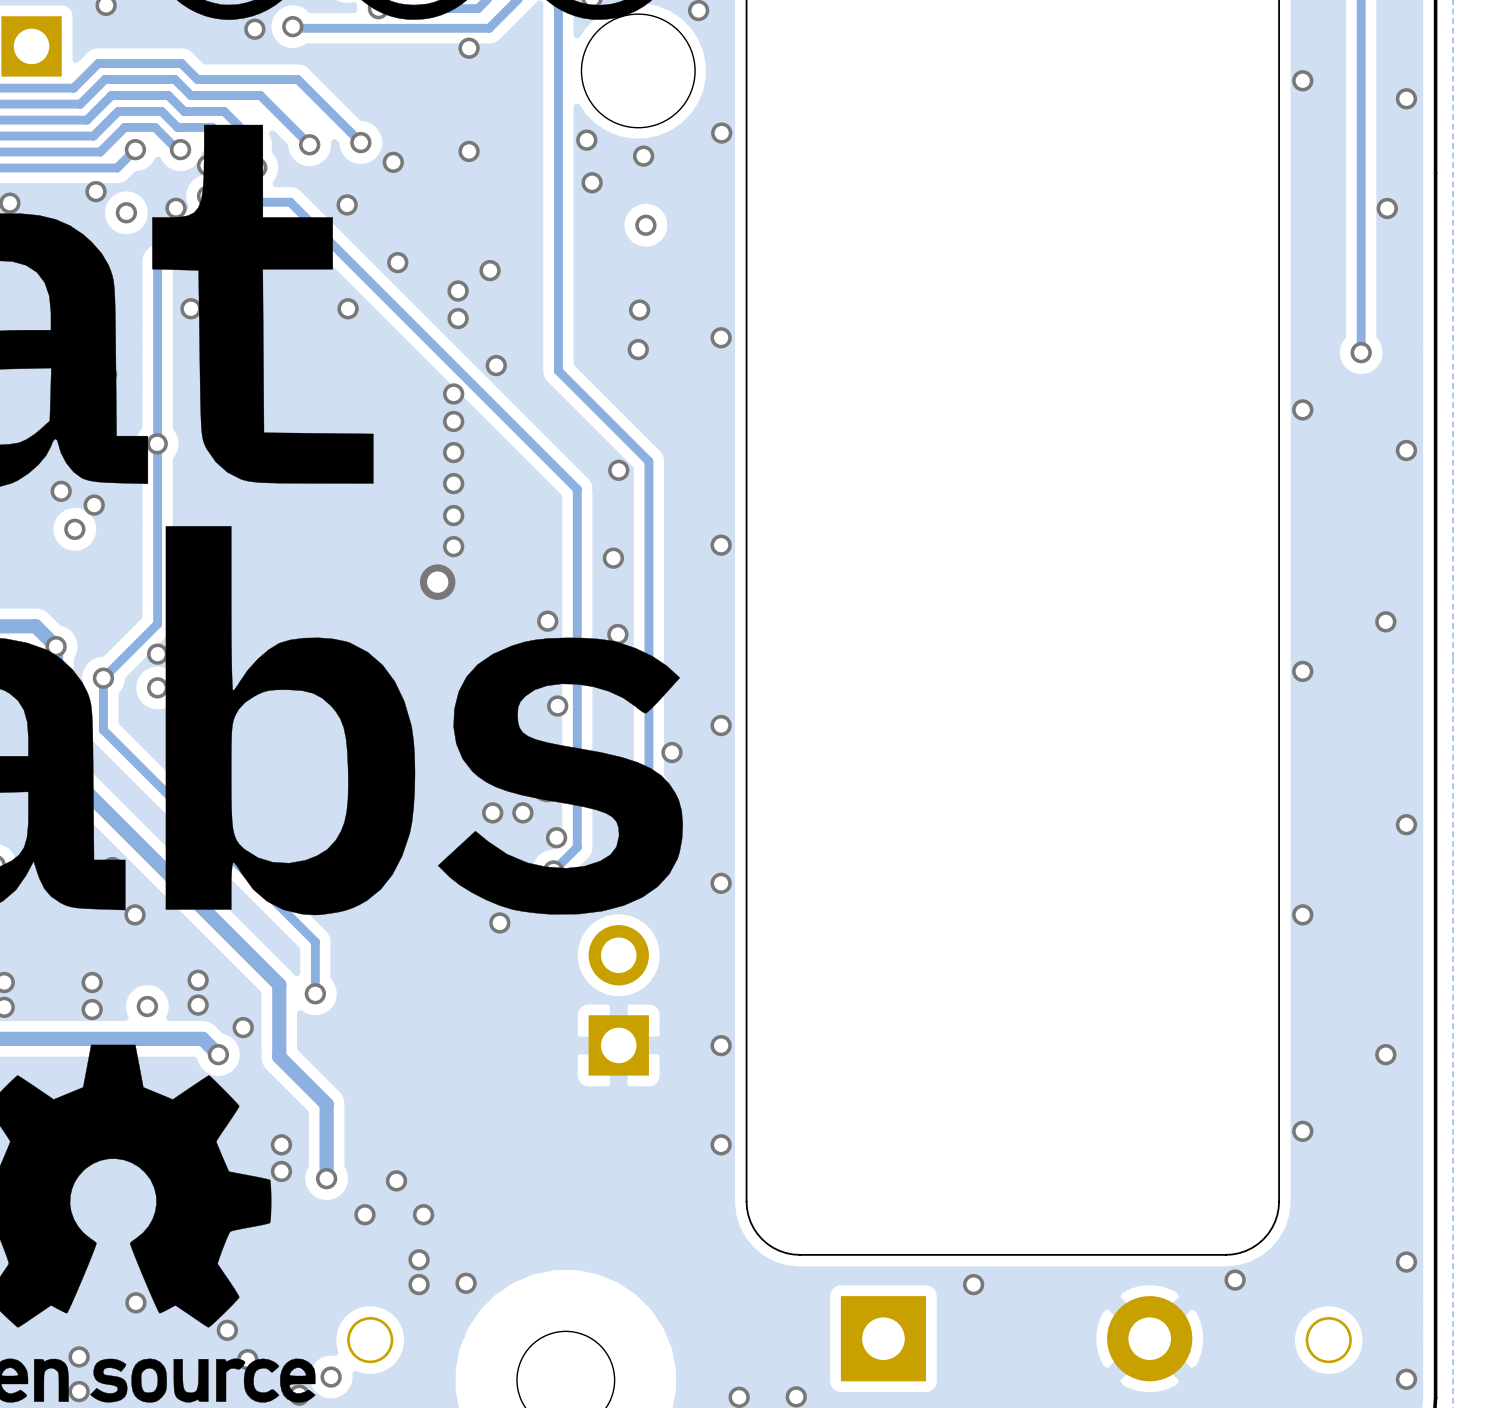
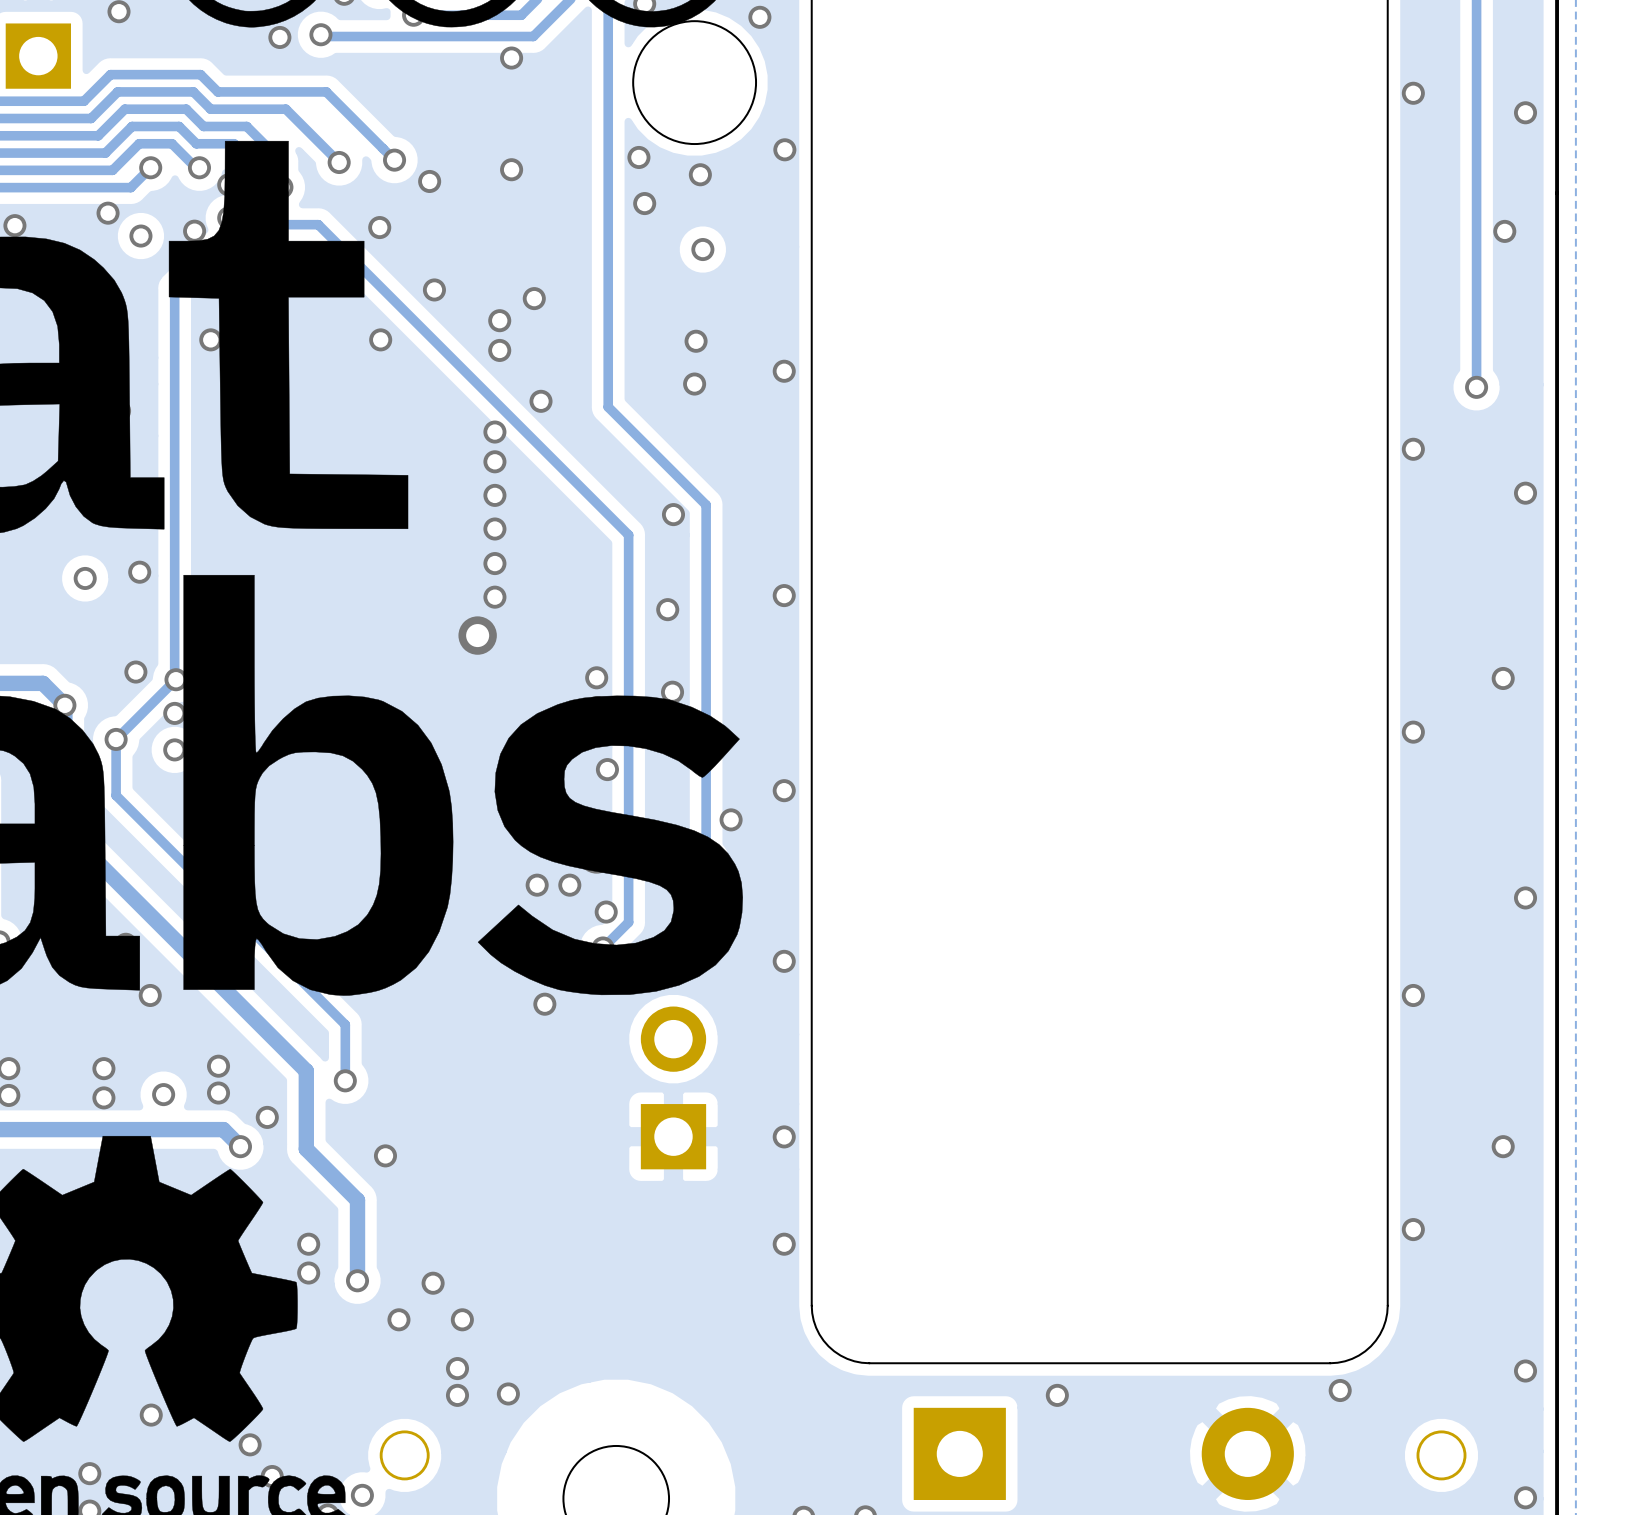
via: (157, 443) -> none
via: (61, 491) -> none
via: (94, 505) -> none
via: none -> (139, 572)
via: none -> (135, 672)
via: none -> (176, 679)
via: none -> (385, 1155)

